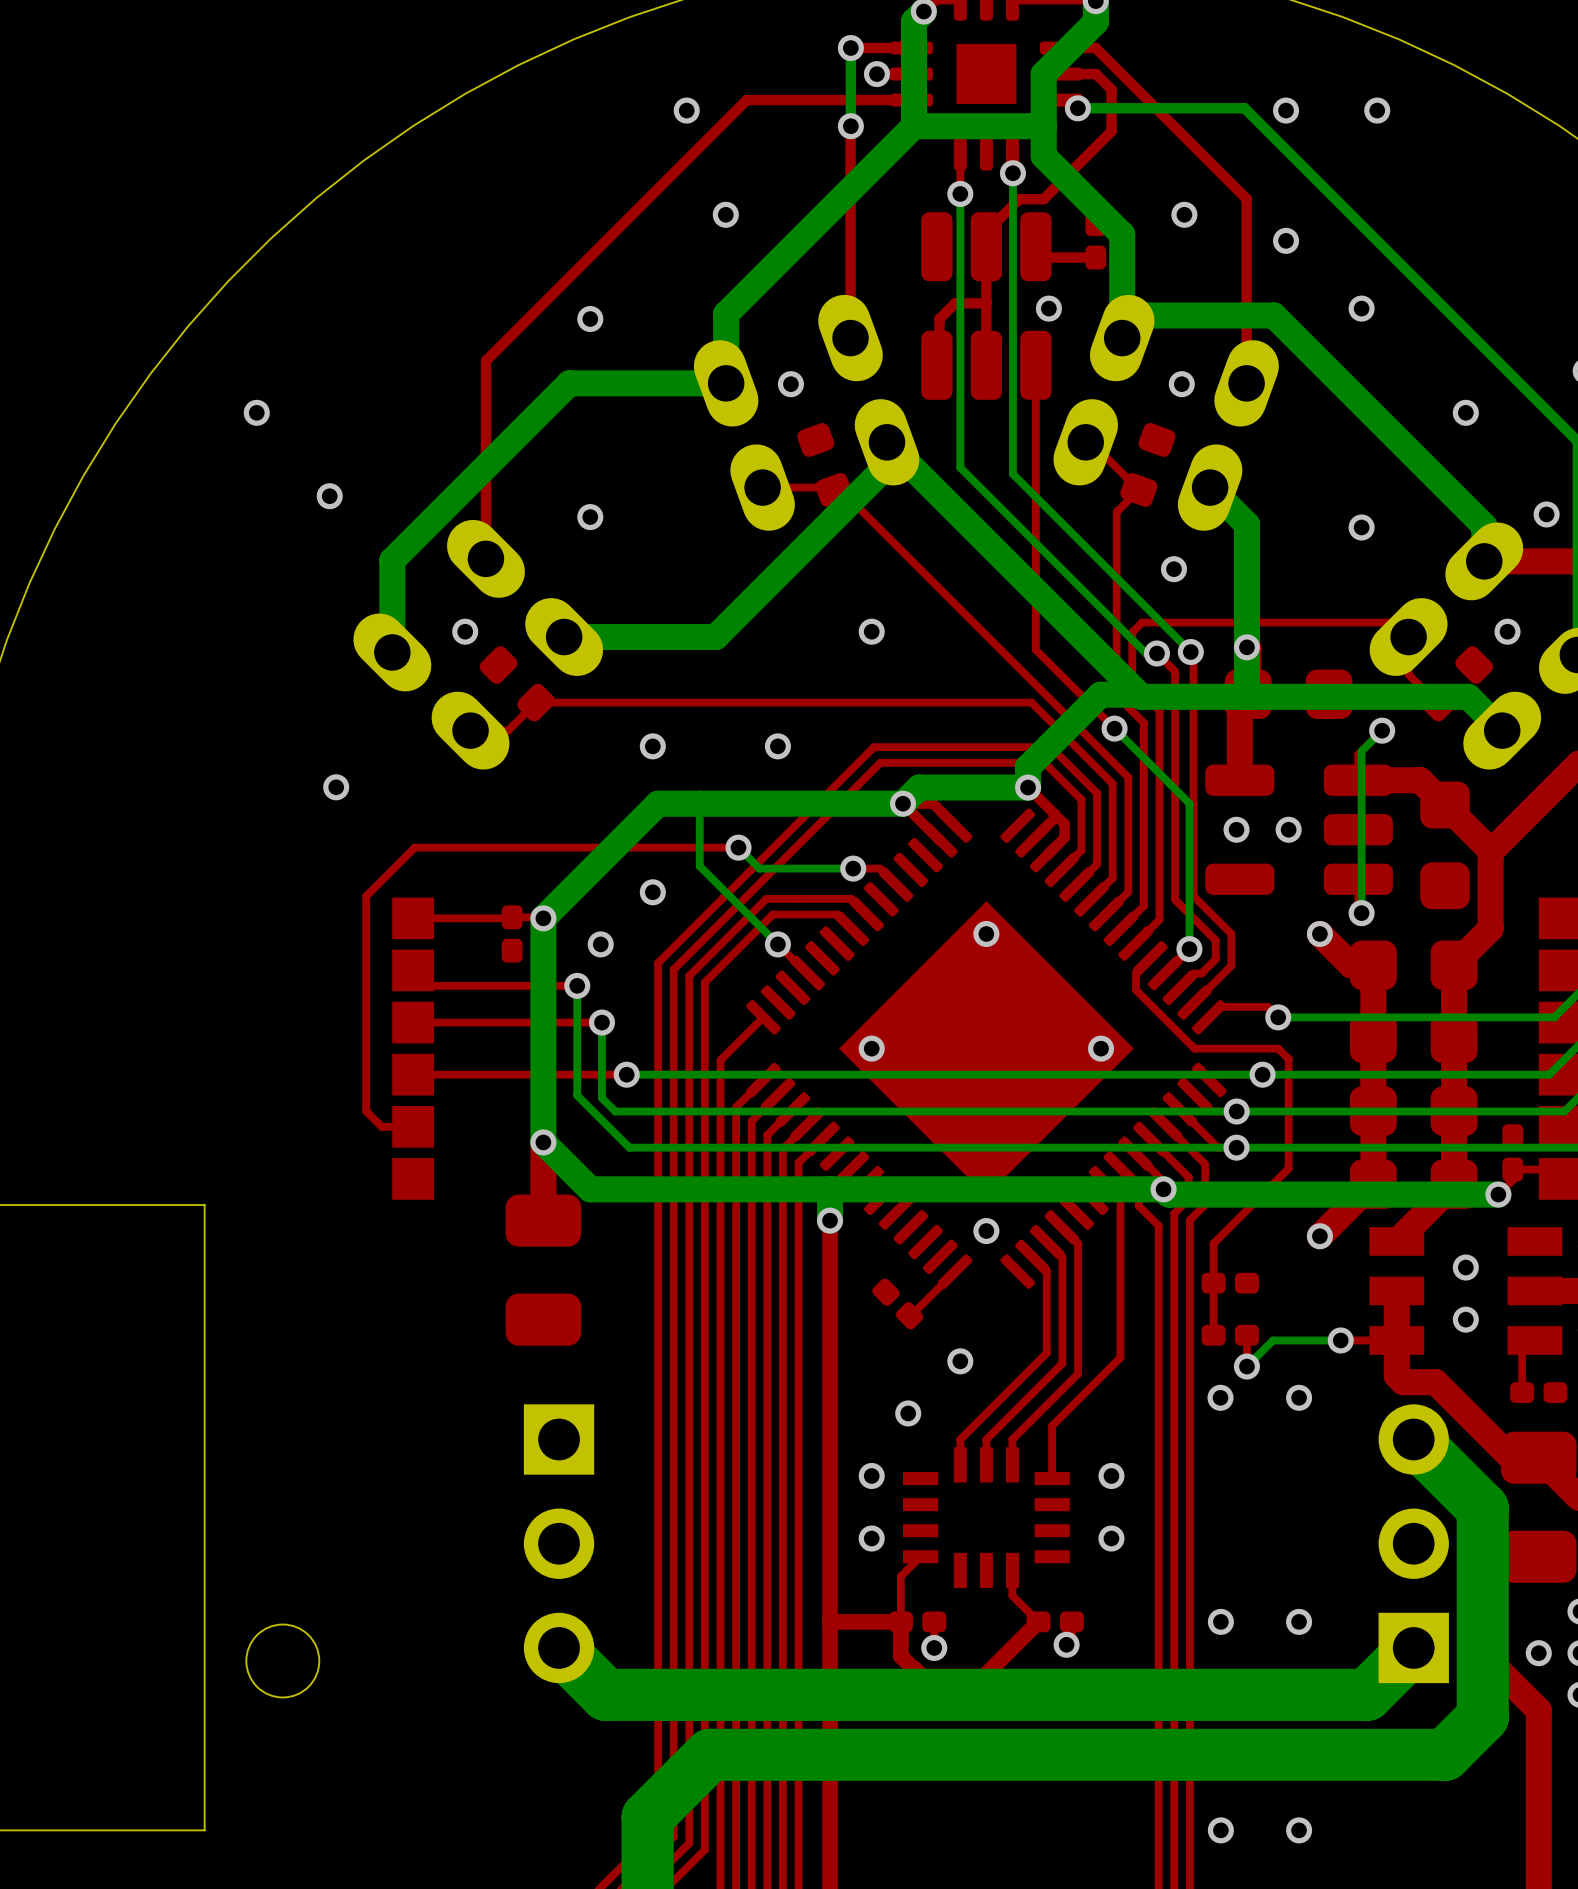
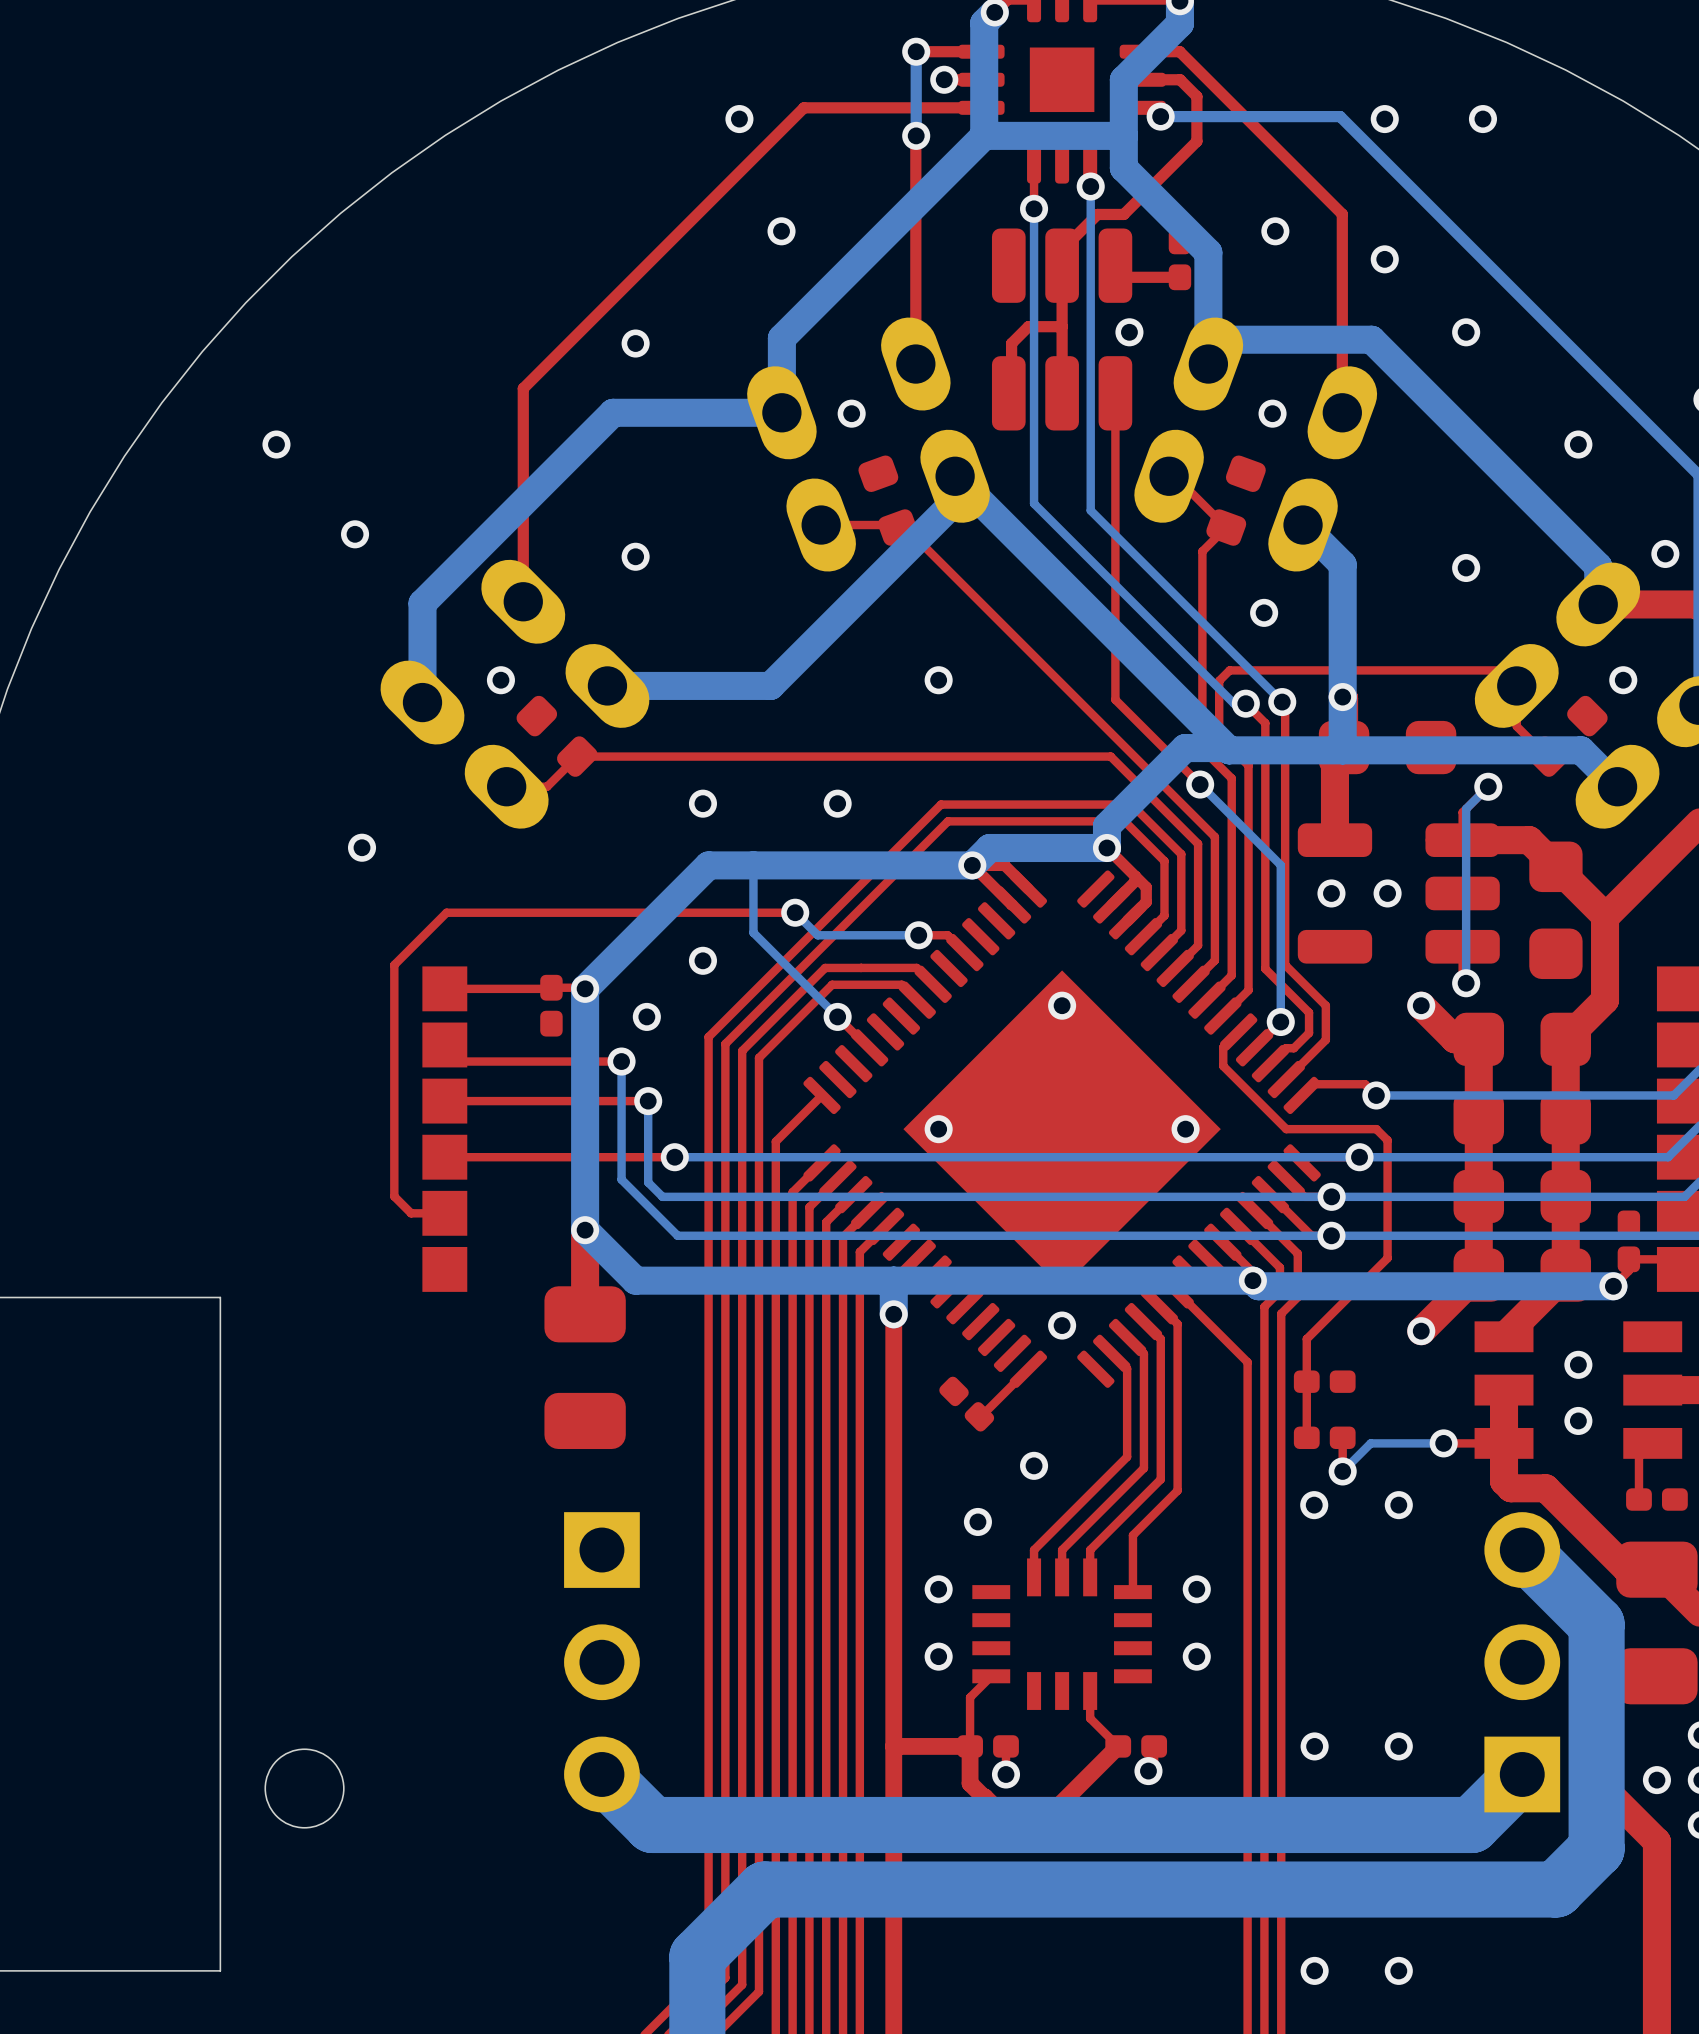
top track: (1120, 1168) (1138, 1186) (1138, 1206) (1158, 1225) (1158, 1265) -> (1175, 1289) (1247, 1362)
top track: (1120, 1197) (1120, 1357) (1093, 1384) -> (1159, 1305) (1177, 1324) (1177, 1490)

